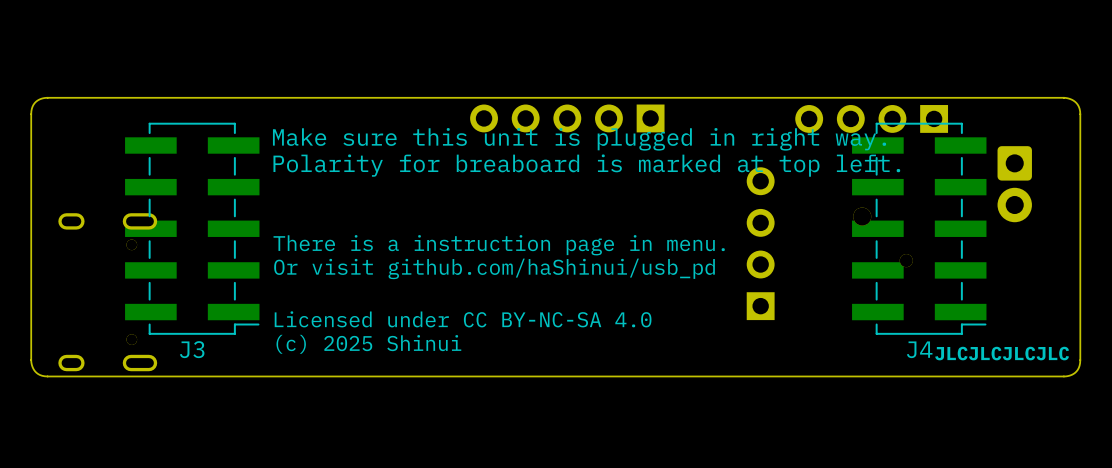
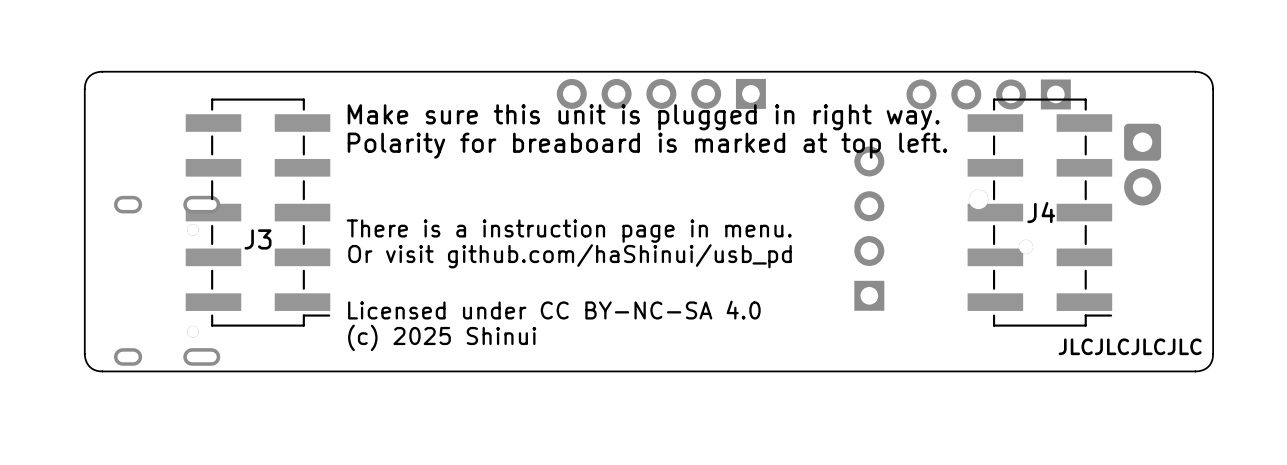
J3 name position: J3 (192, 349) -> J3 (258, 239)
J4 name position: J4 (919, 349) -> J4 (1041, 212)

